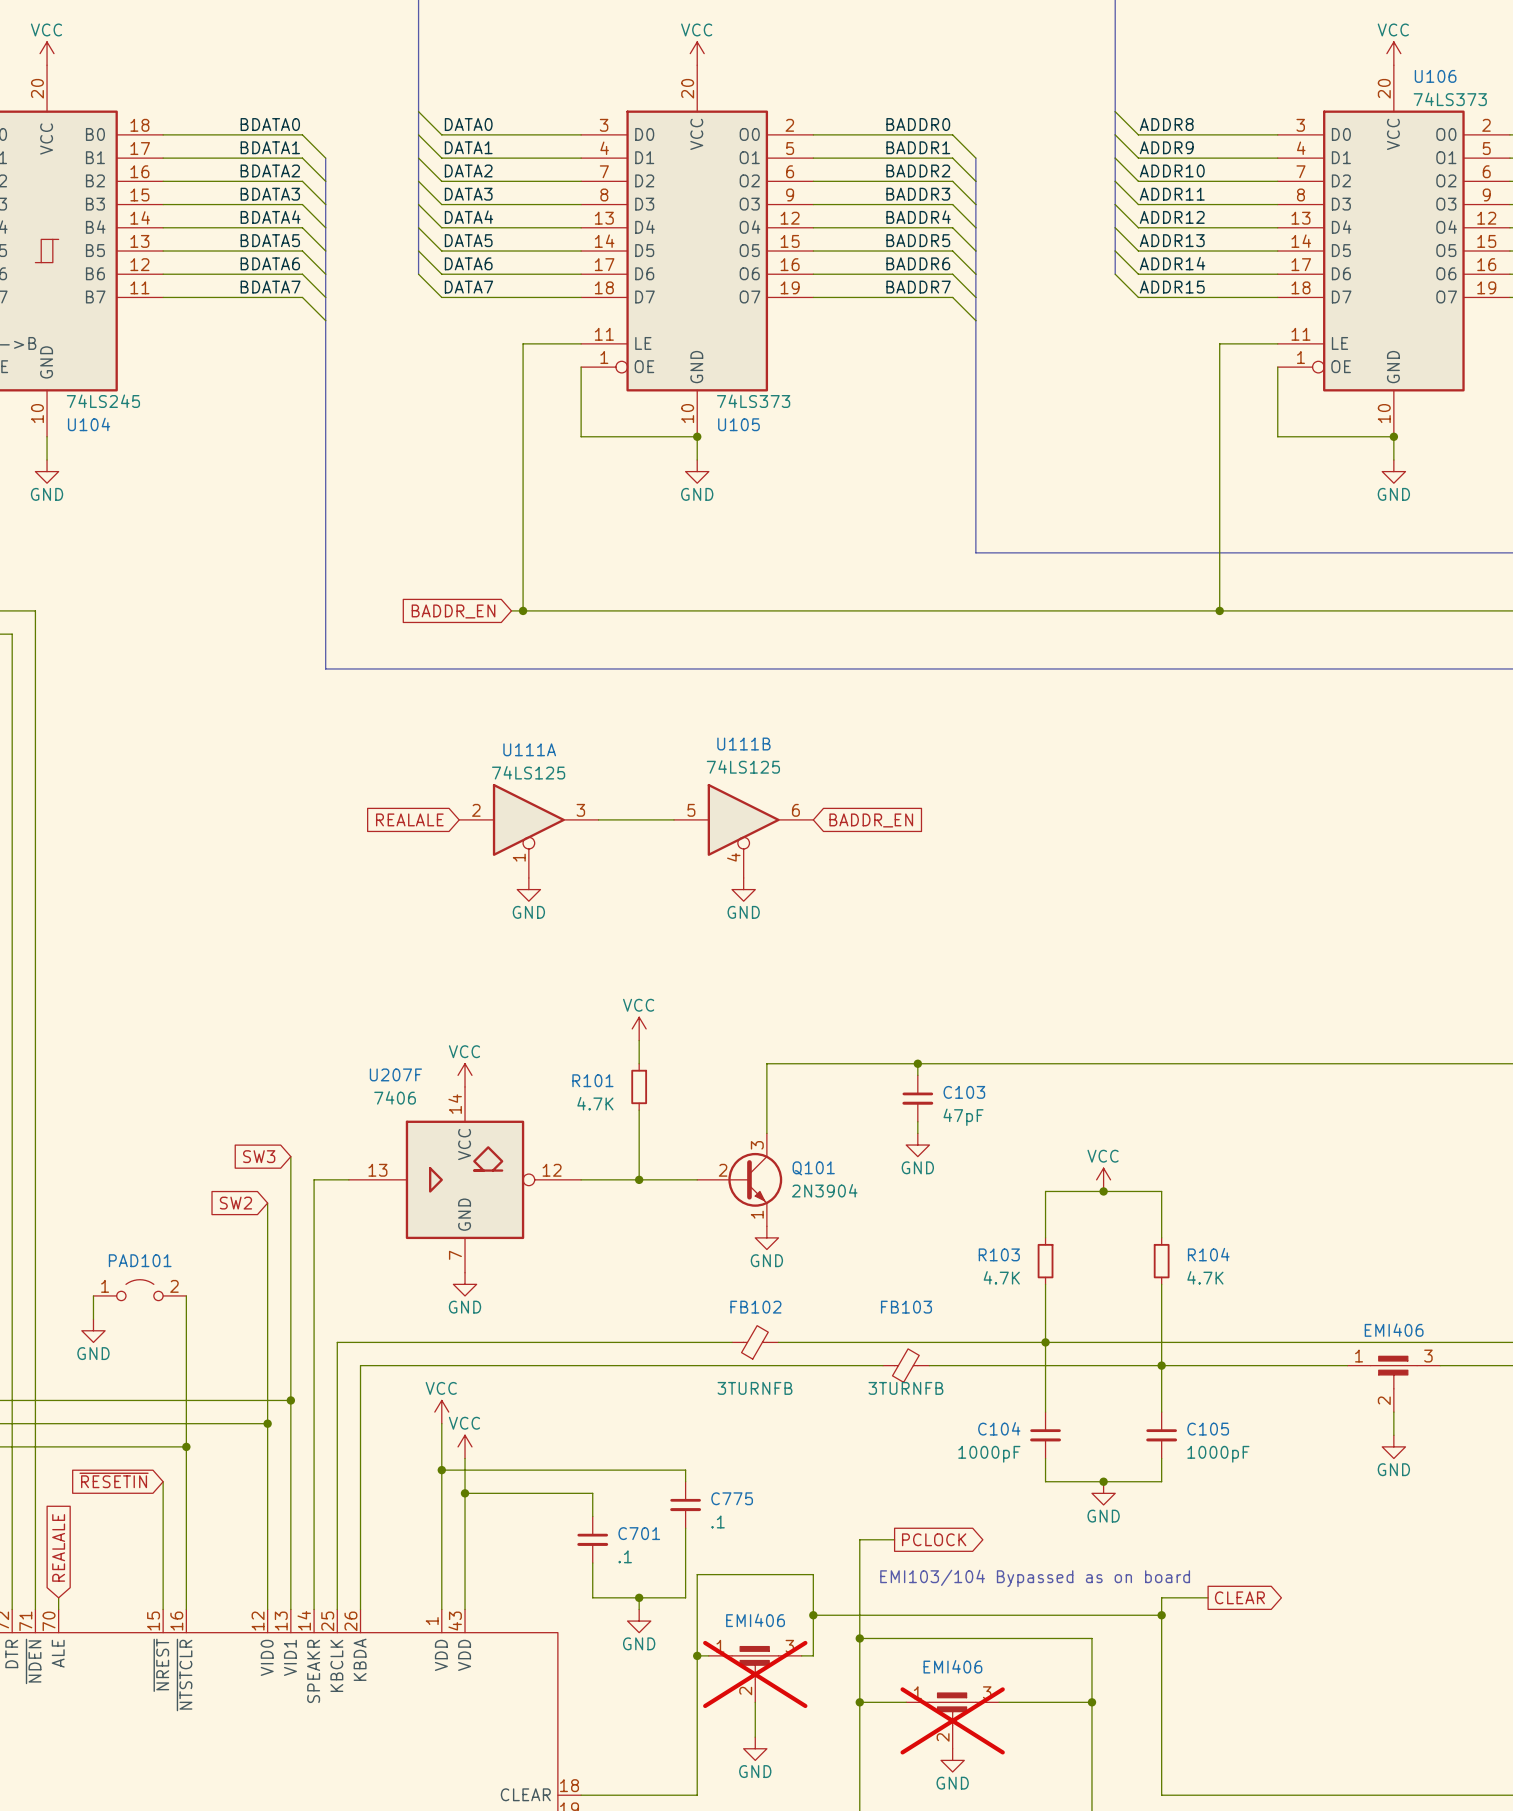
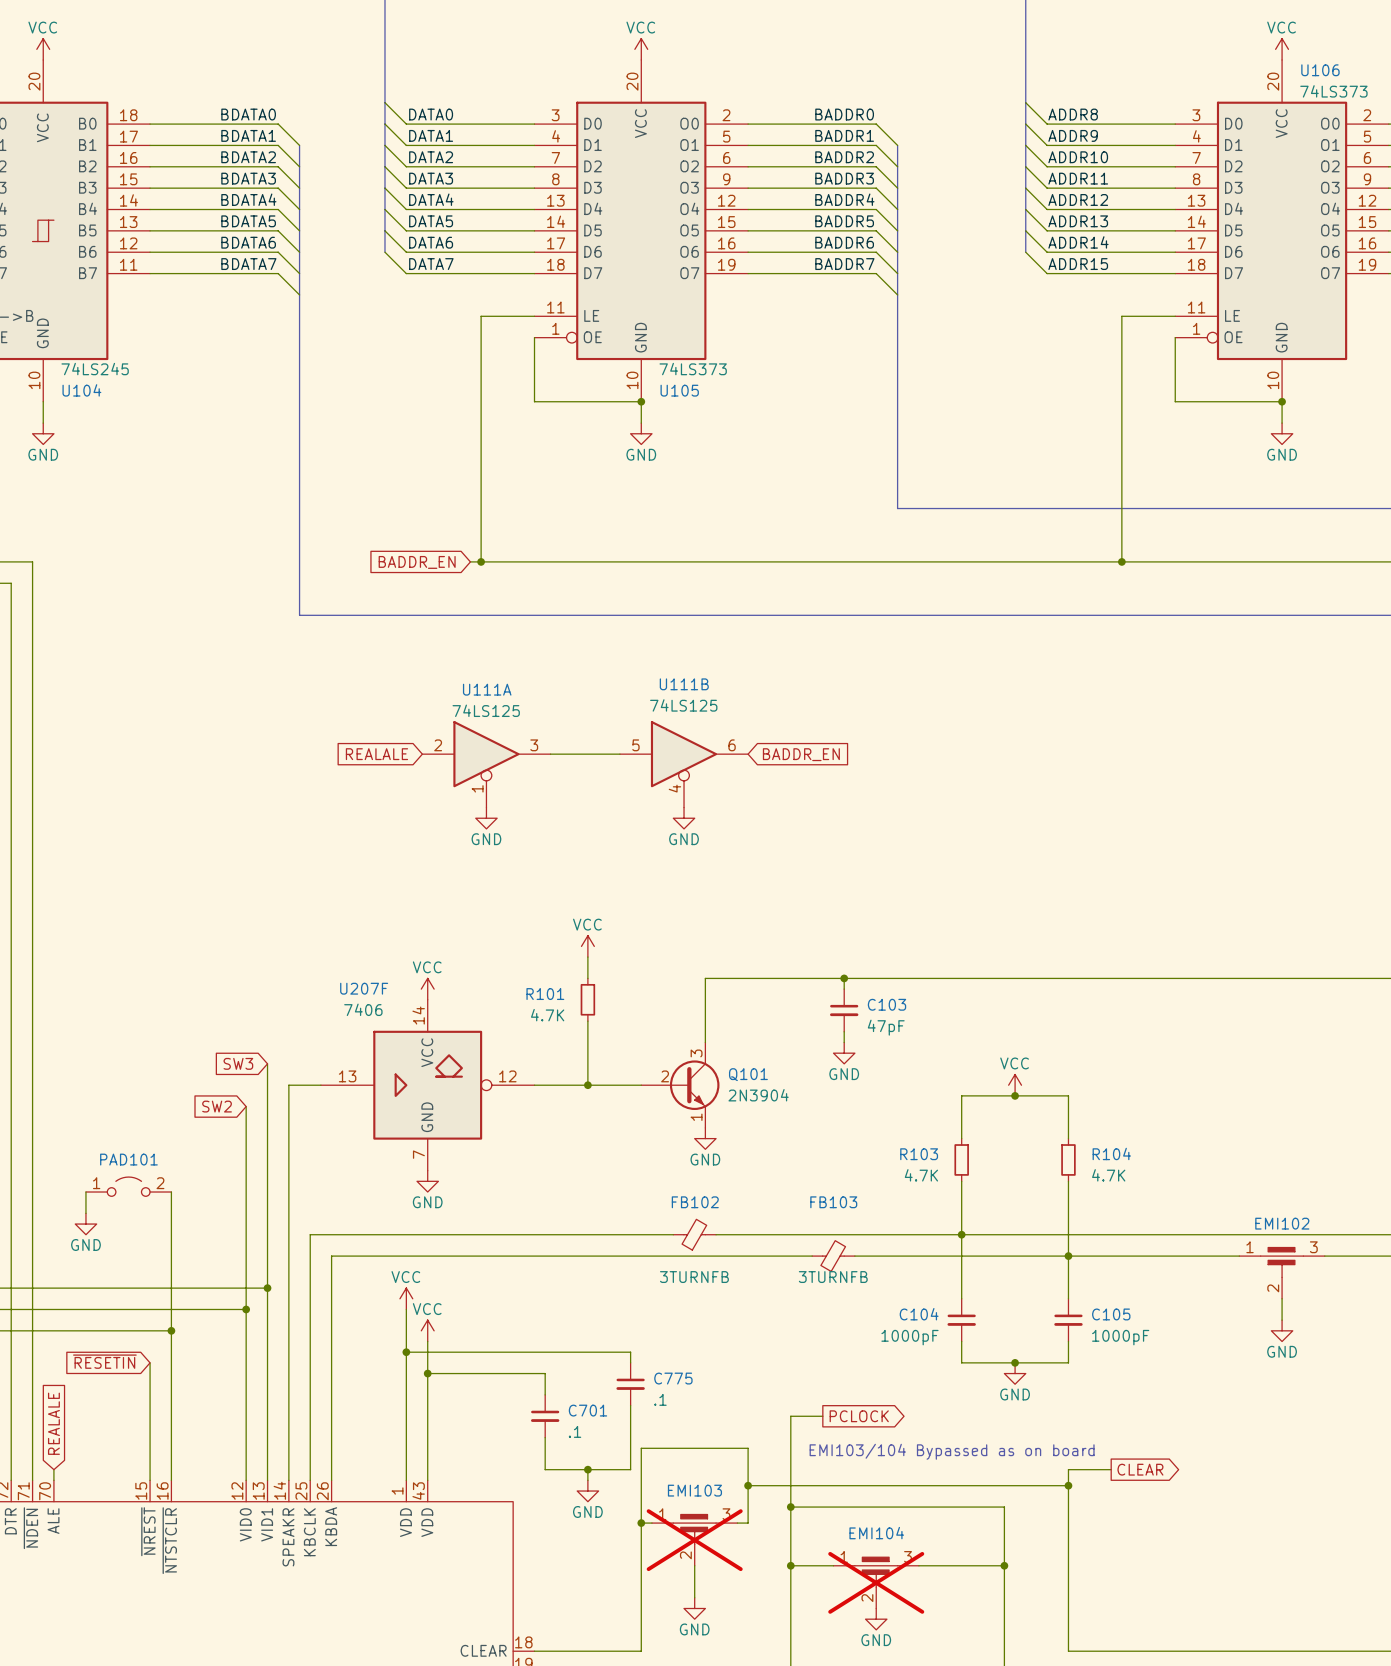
EMI406 name: EMI406 (1394, 1330) -> EMI102 (1282, 1223)
EMI406 name: EMI406 (755, 1620) -> EMI103 (694, 1490)
EMI406 name: EMI406 (952, 1666) -> EMI104 (876, 1533)

